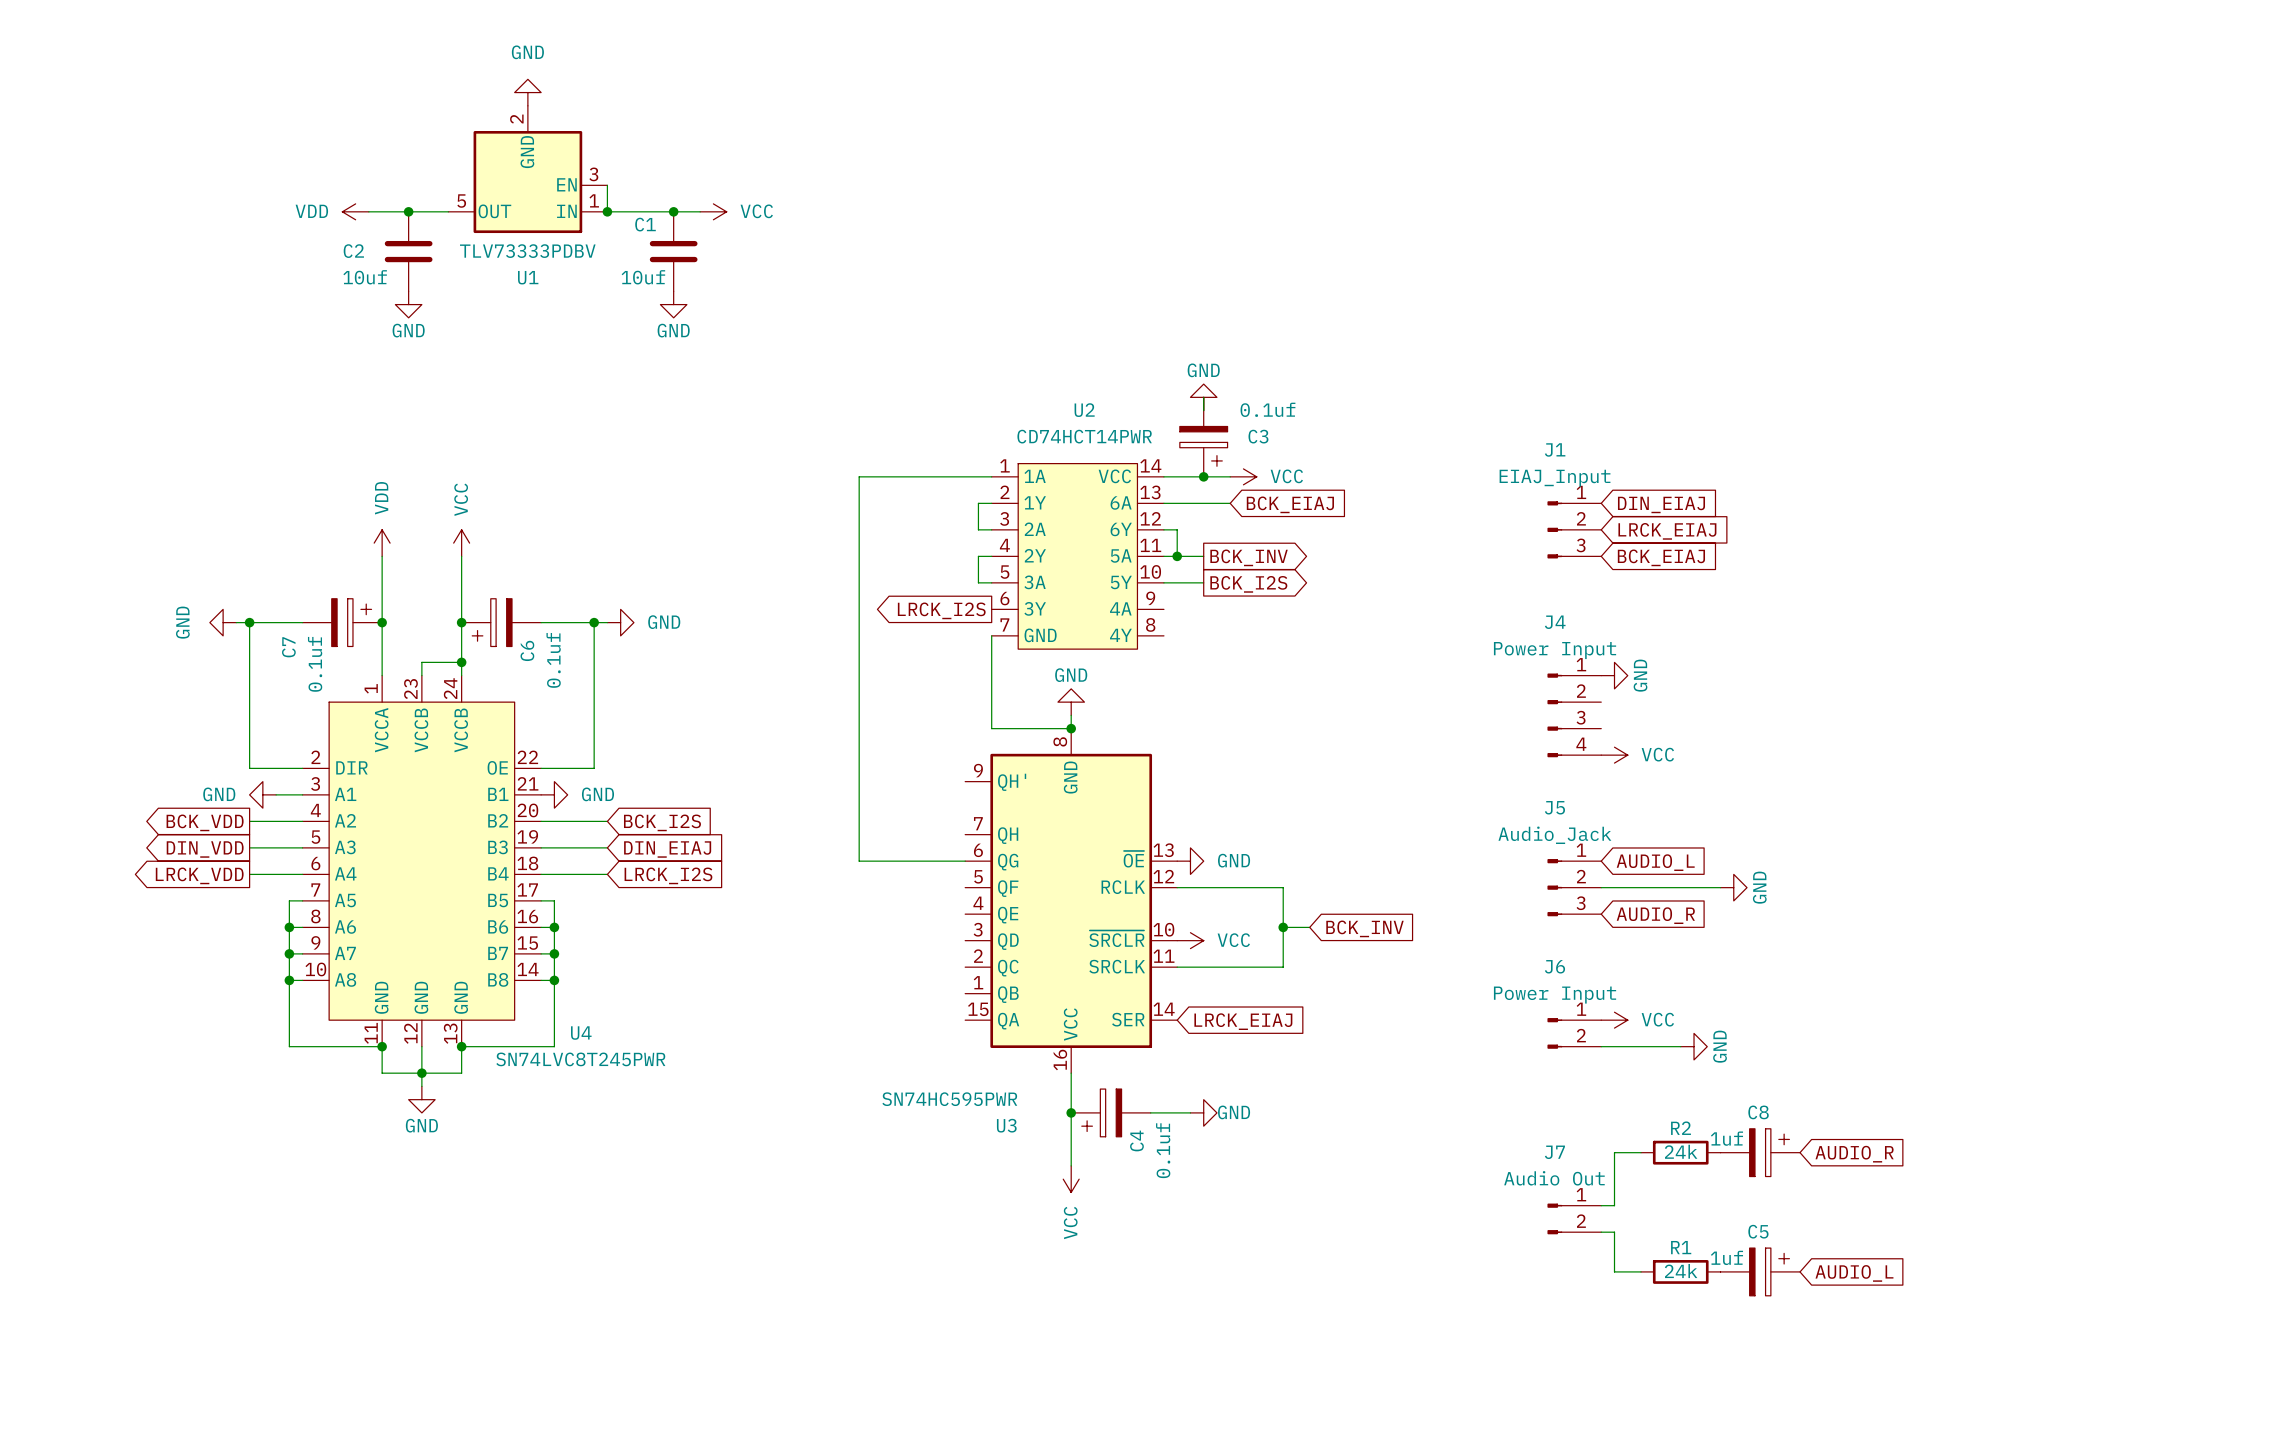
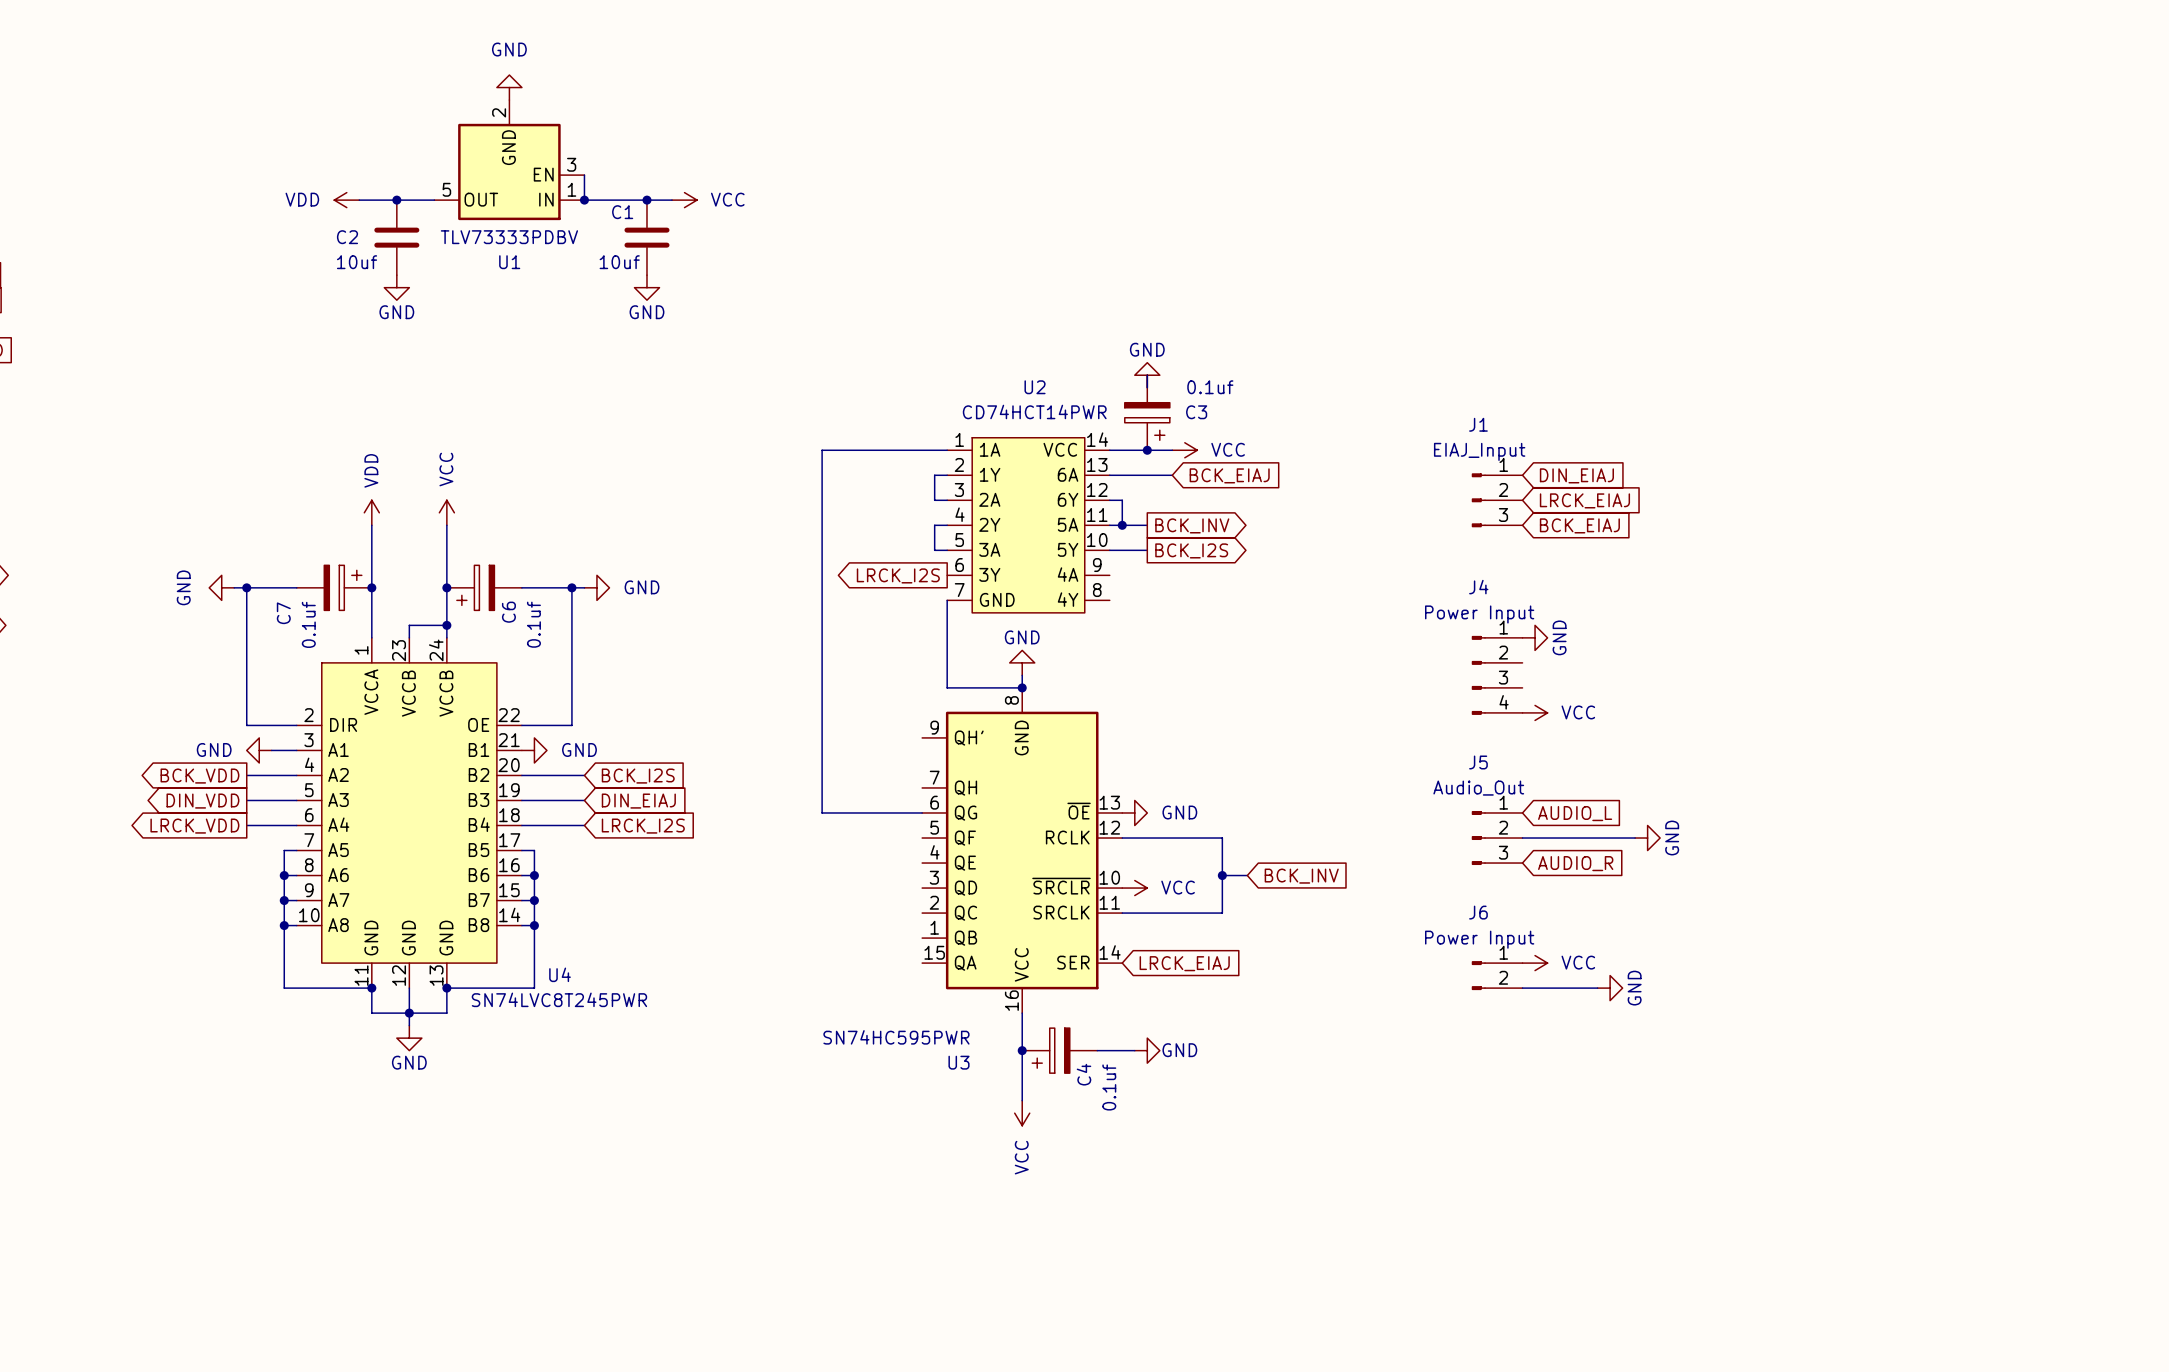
J5 value: Audio_Jack (1554, 835) -> Audio_Out (1478, 788)
wire: (1641, 1152) (1614, 1152) (1614, 1205) (1601, 1205) -> none
R2: 24k (1680, 1152) -> none
C8: 1uf (1760, 1152) -> none
global label: AUDIO_R (1854, 1154) -> none
J7: Audio Out (1574, 1218) -> none
wire: (1601, 1232) (1614, 1232) (1614, 1271) (1641, 1271) -> none
R1: 24k (1680, 1271) -> none
C5: 1uf (1760, 1271) -> none
global label: AUDIO_L (1854, 1273) -> none

